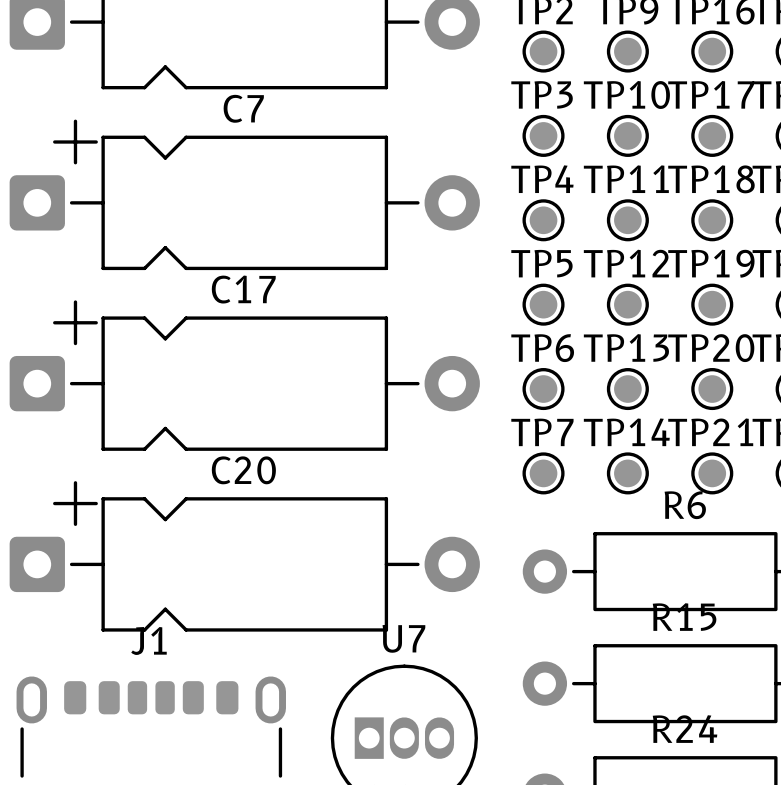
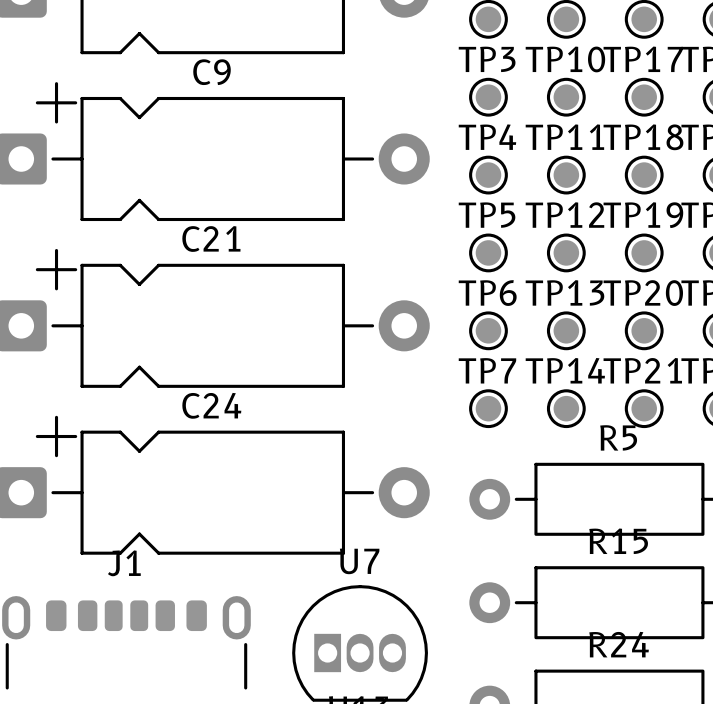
C7 name: C7 (243, 108) -> C9 (212, 72)
C17 name: C17 (243, 289) -> C21 (211, 238)
C20 name: C20 (243, 470) -> C24 (211, 405)
R6 name: R6 (685, 505) -> R5 (618, 437)

